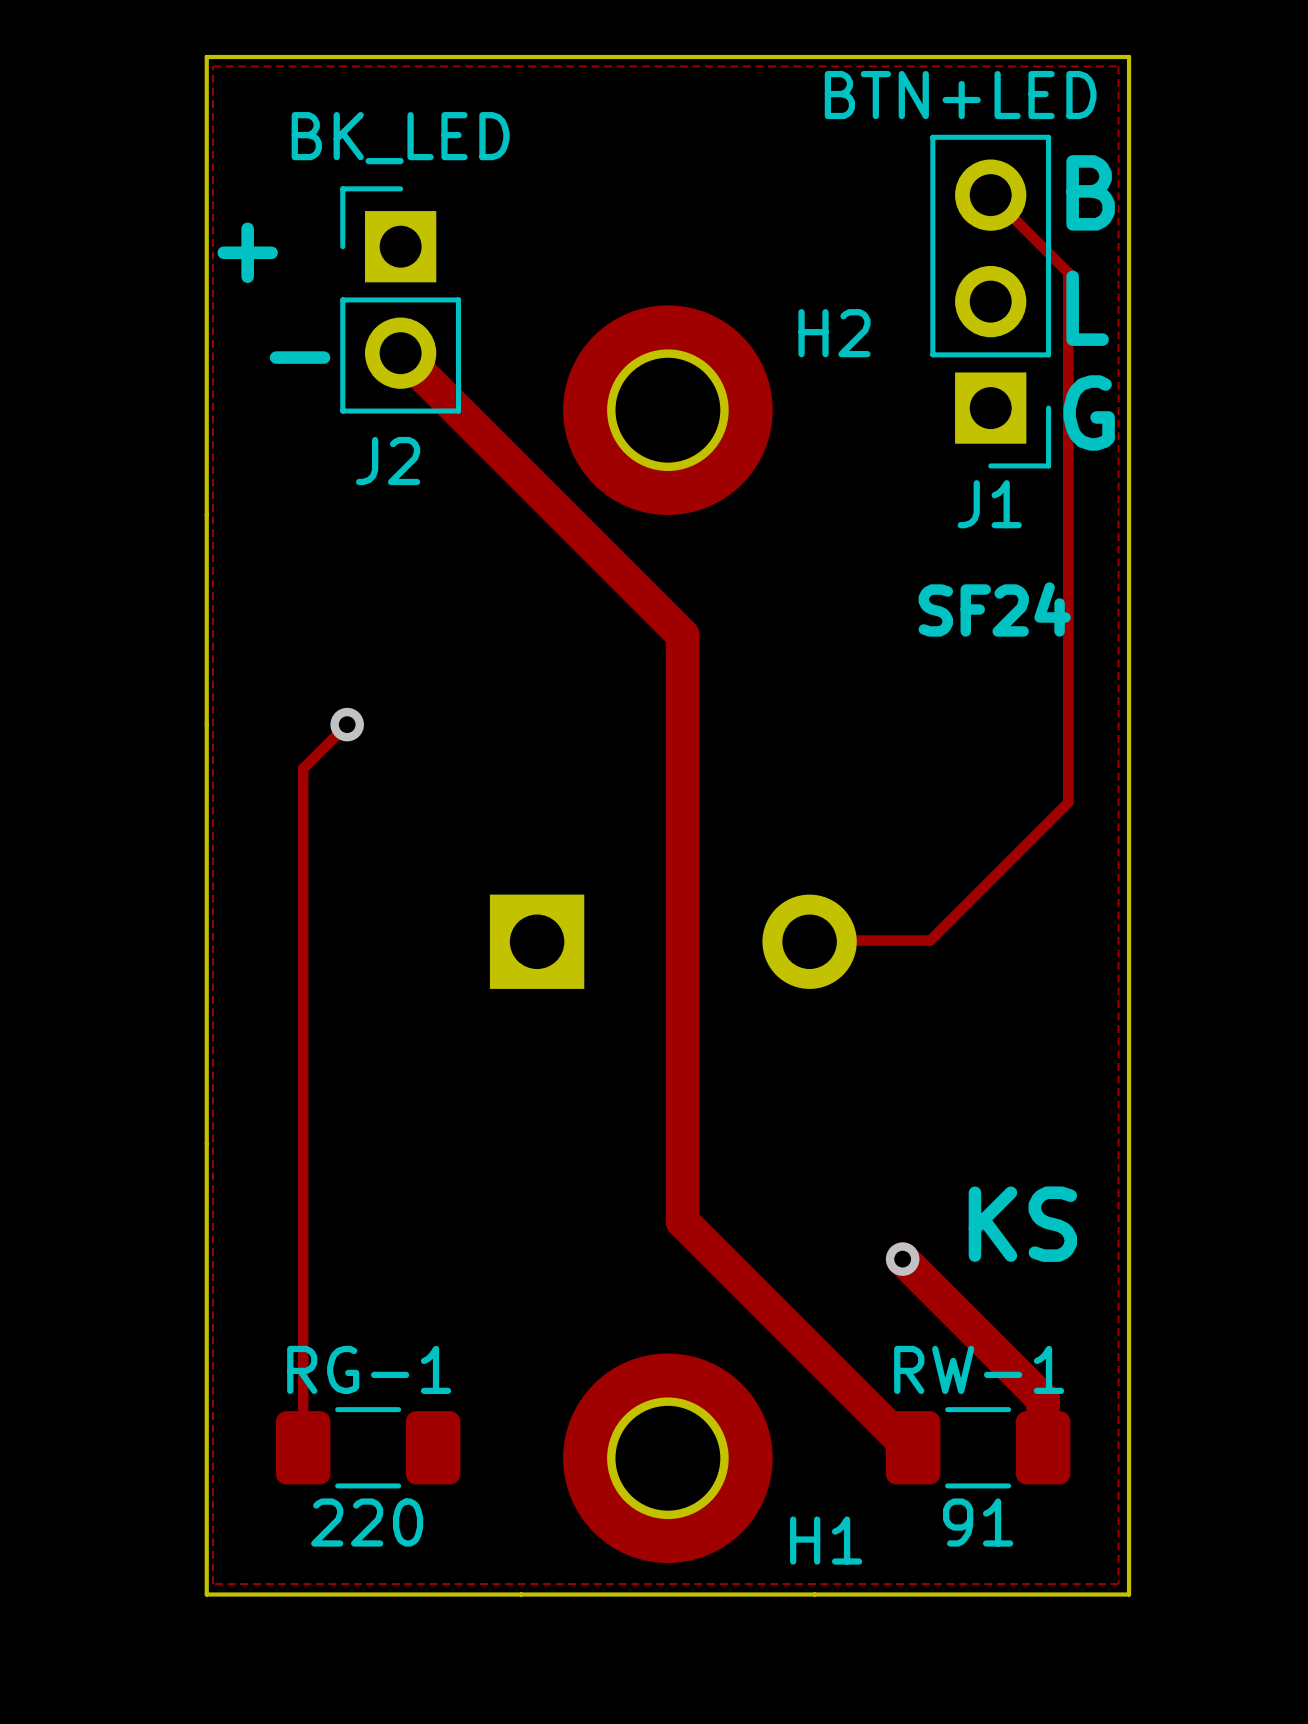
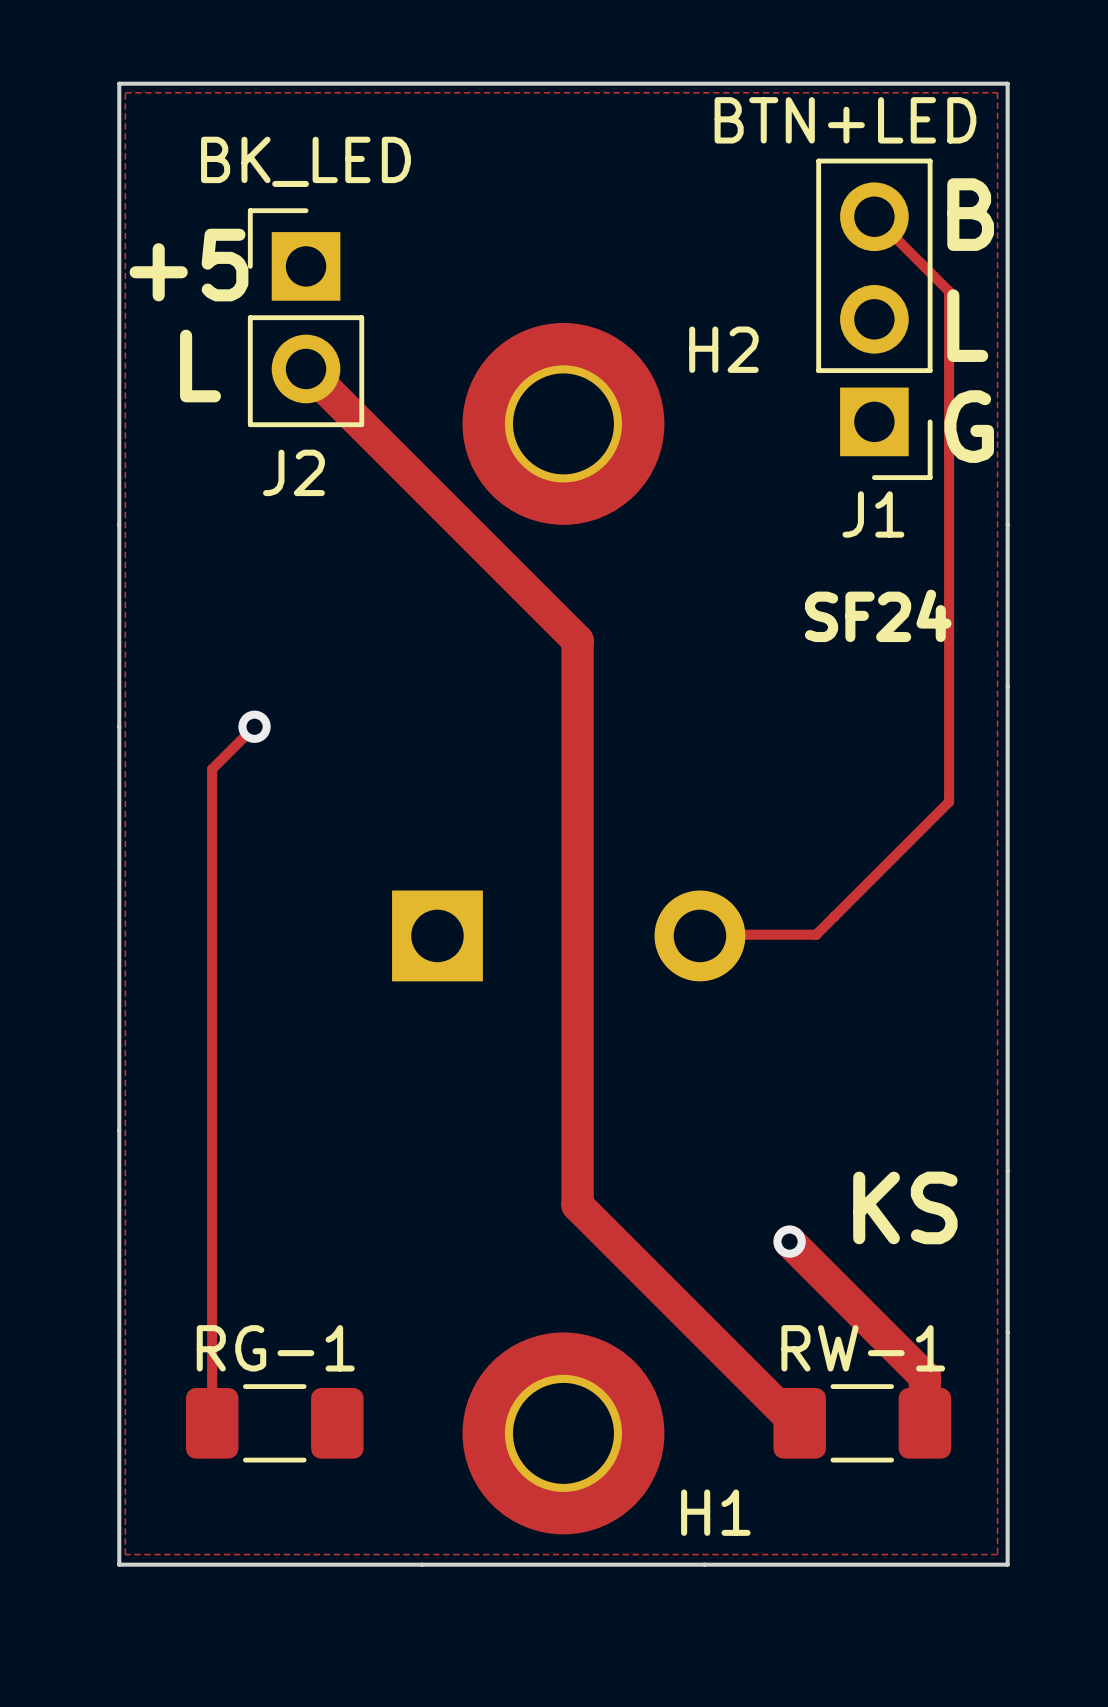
text: + (247, 252) -> +5 (188, 265)
text: - (300, 357) -> L (200, 366)
RG-1 value: 220 (367, 1522) -> none
RW-1 value: 91 (978, 1522) -> none

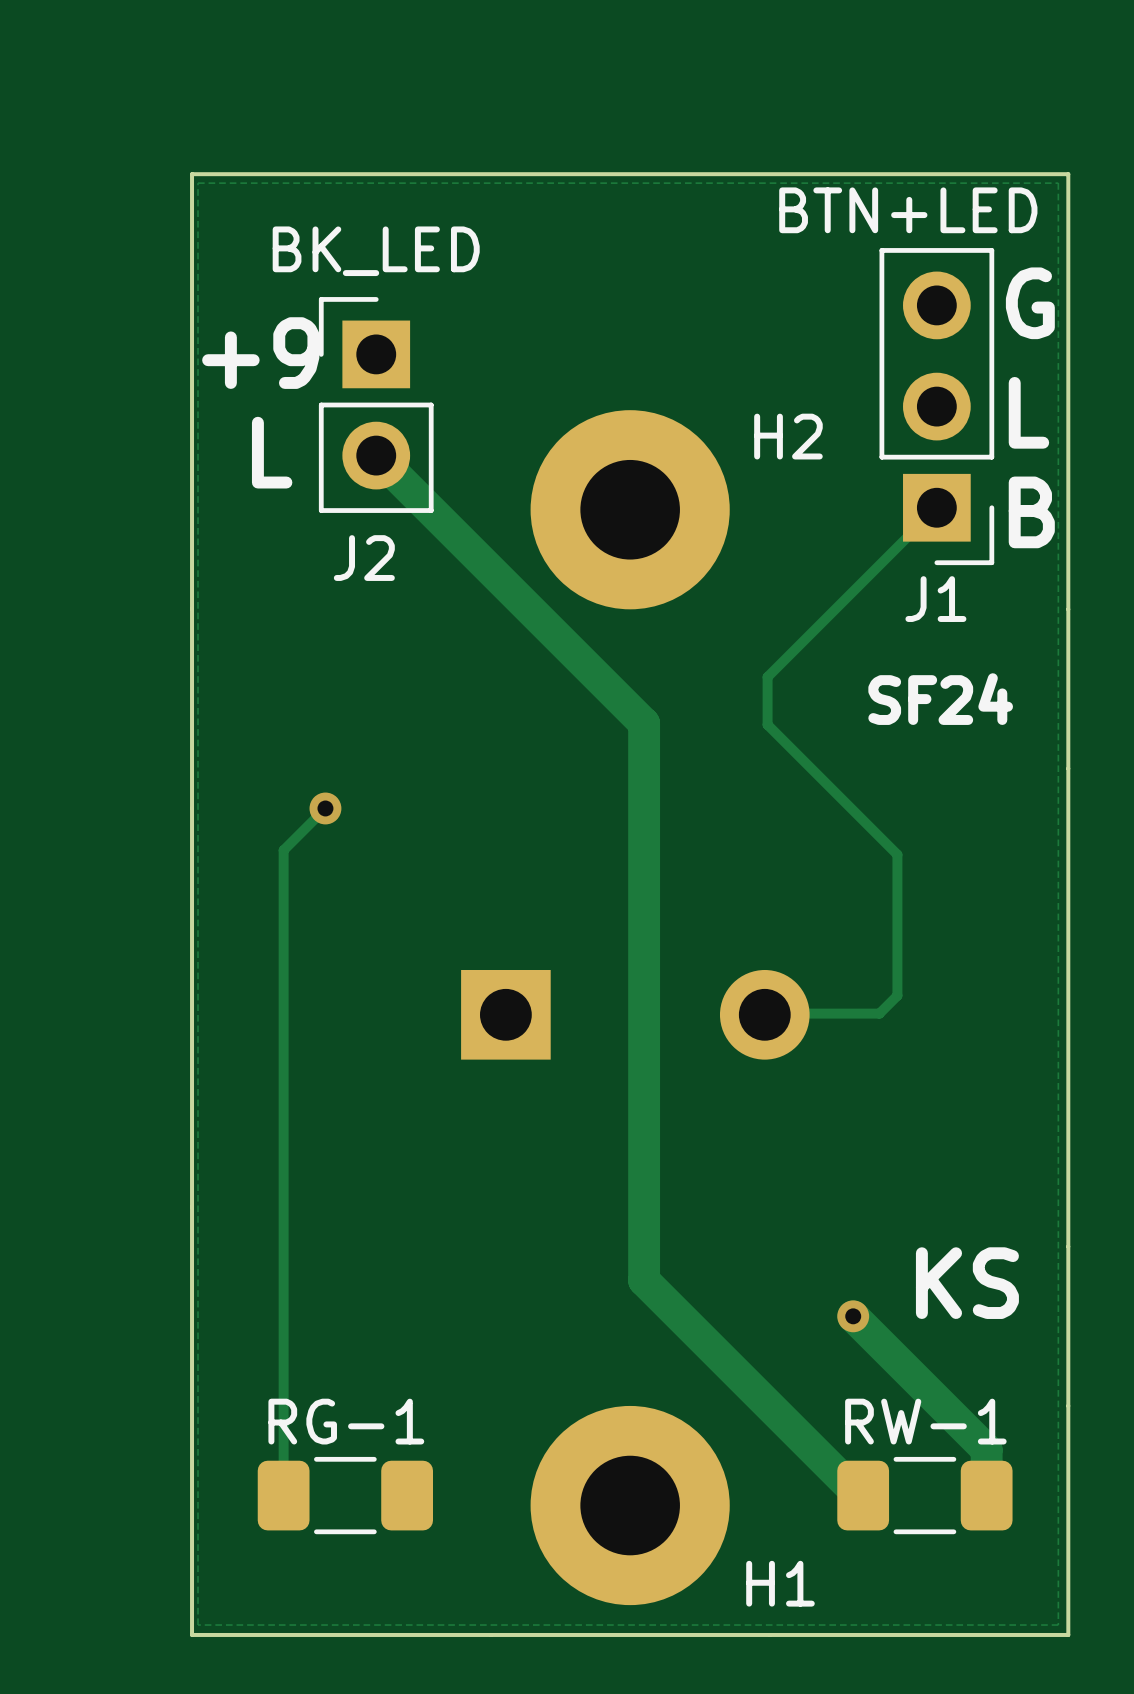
text: B (970, 214) -> G (1030, 303)
track: (874, 216) (949, 291) (949, 801) (834, 916) -> (936, 507) (767, 677) (767, 724) (897, 854) (897, 995)
text: +5 (188, 265) -> +9 (260, 353)
text: G (969, 426) -> B (1031, 512)

